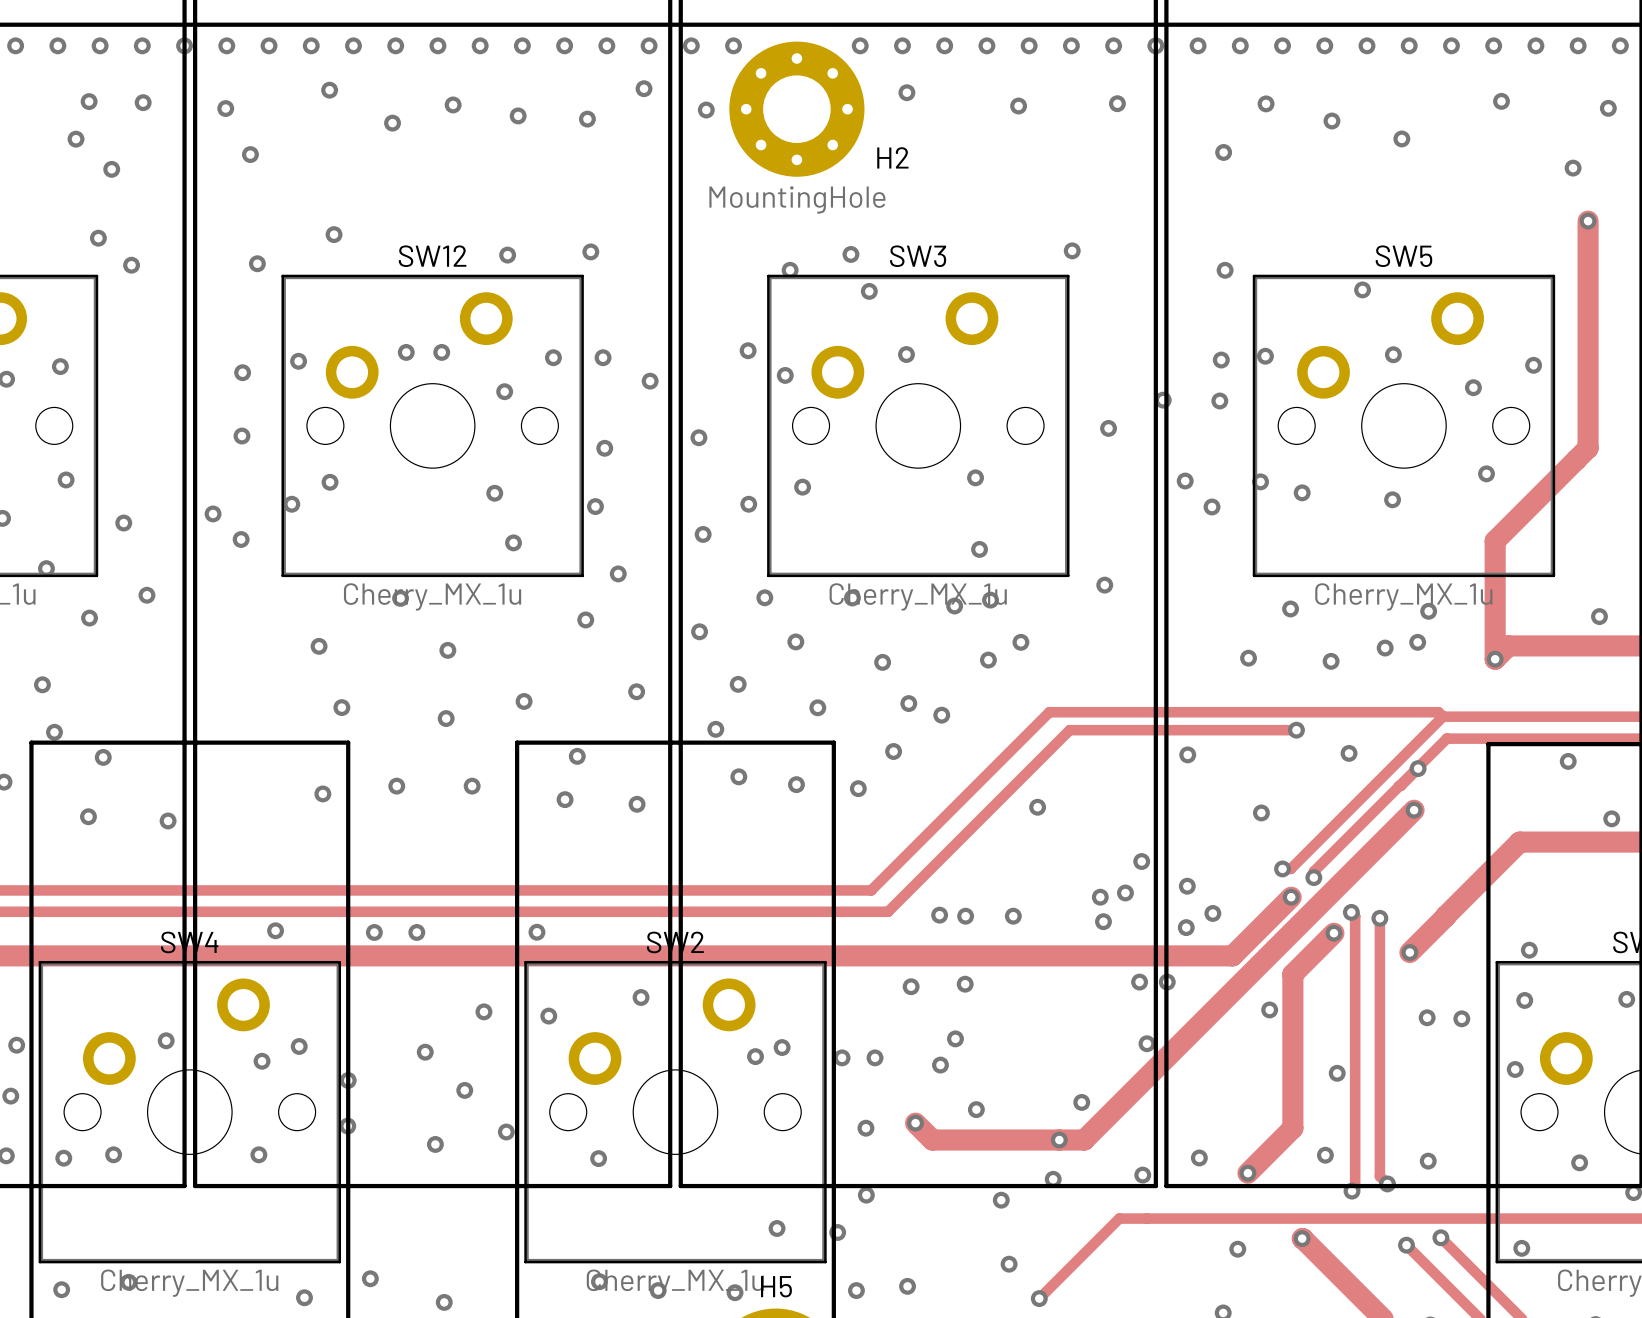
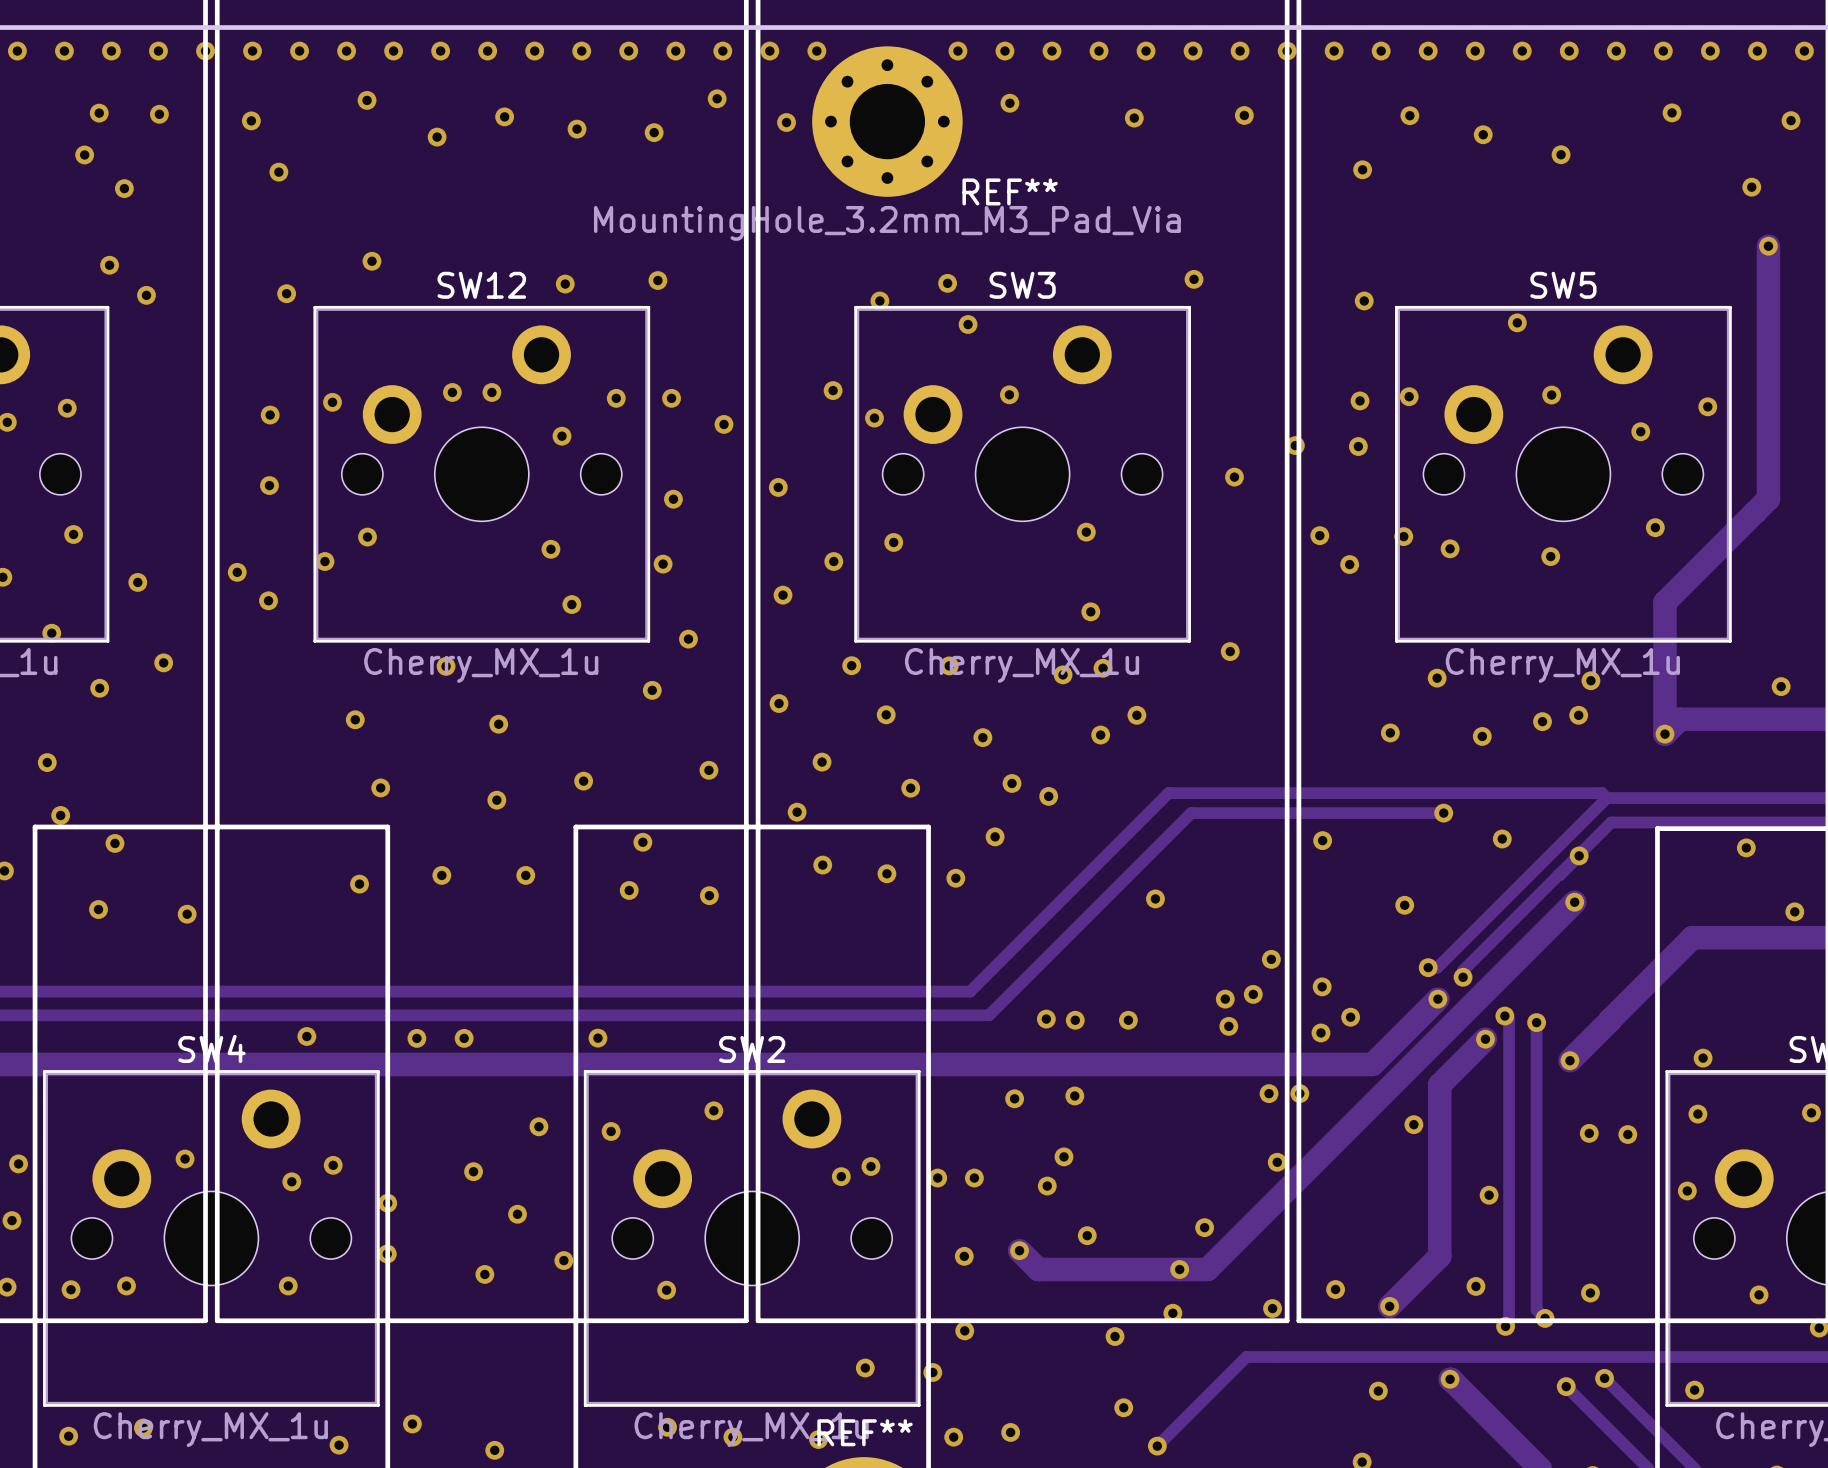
H2 name: H2 (892, 157) -> REF** (1010, 191)
H2 value: MountingHole (797, 199) -> MountingHole_3.2mm_M3_Pad_Via (887, 223)
H5 name: H5 (776, 1286) -> REF** (865, 1432)

